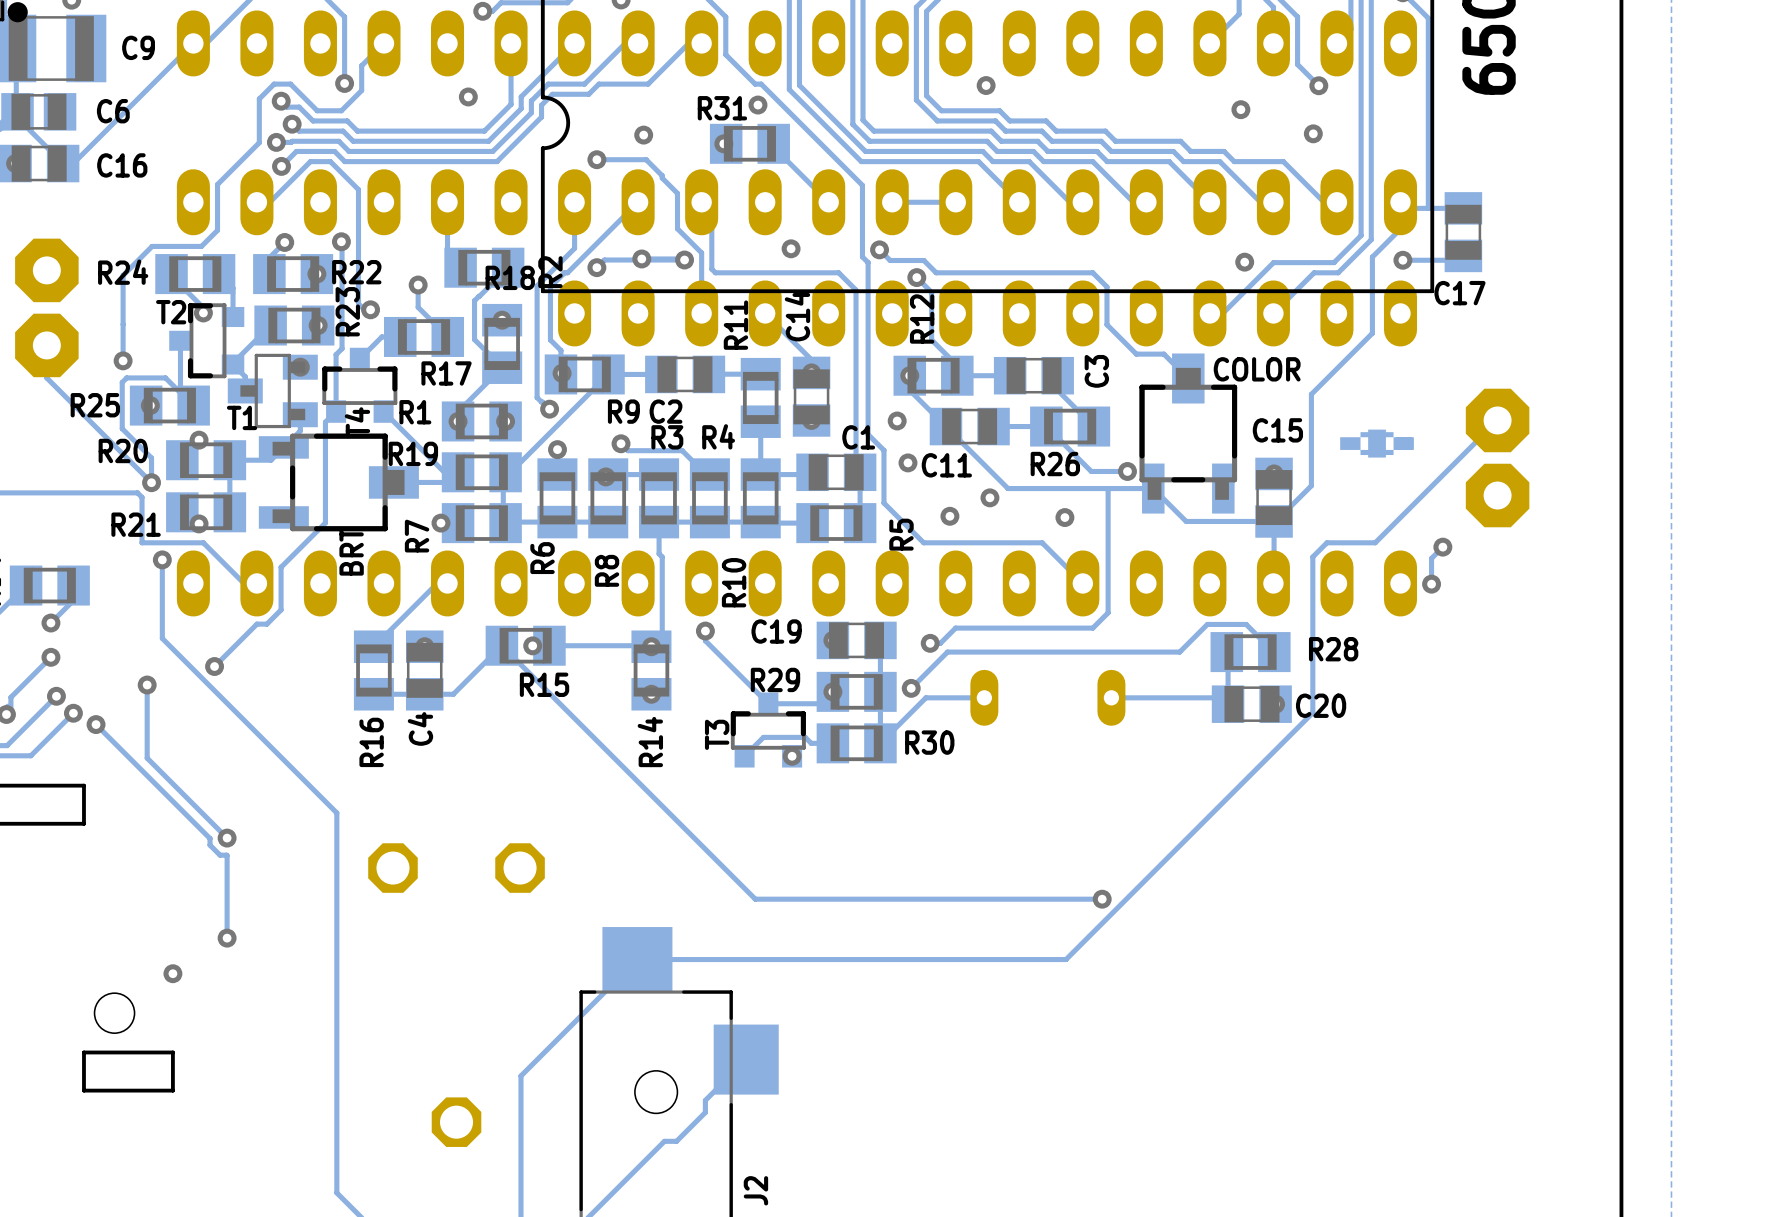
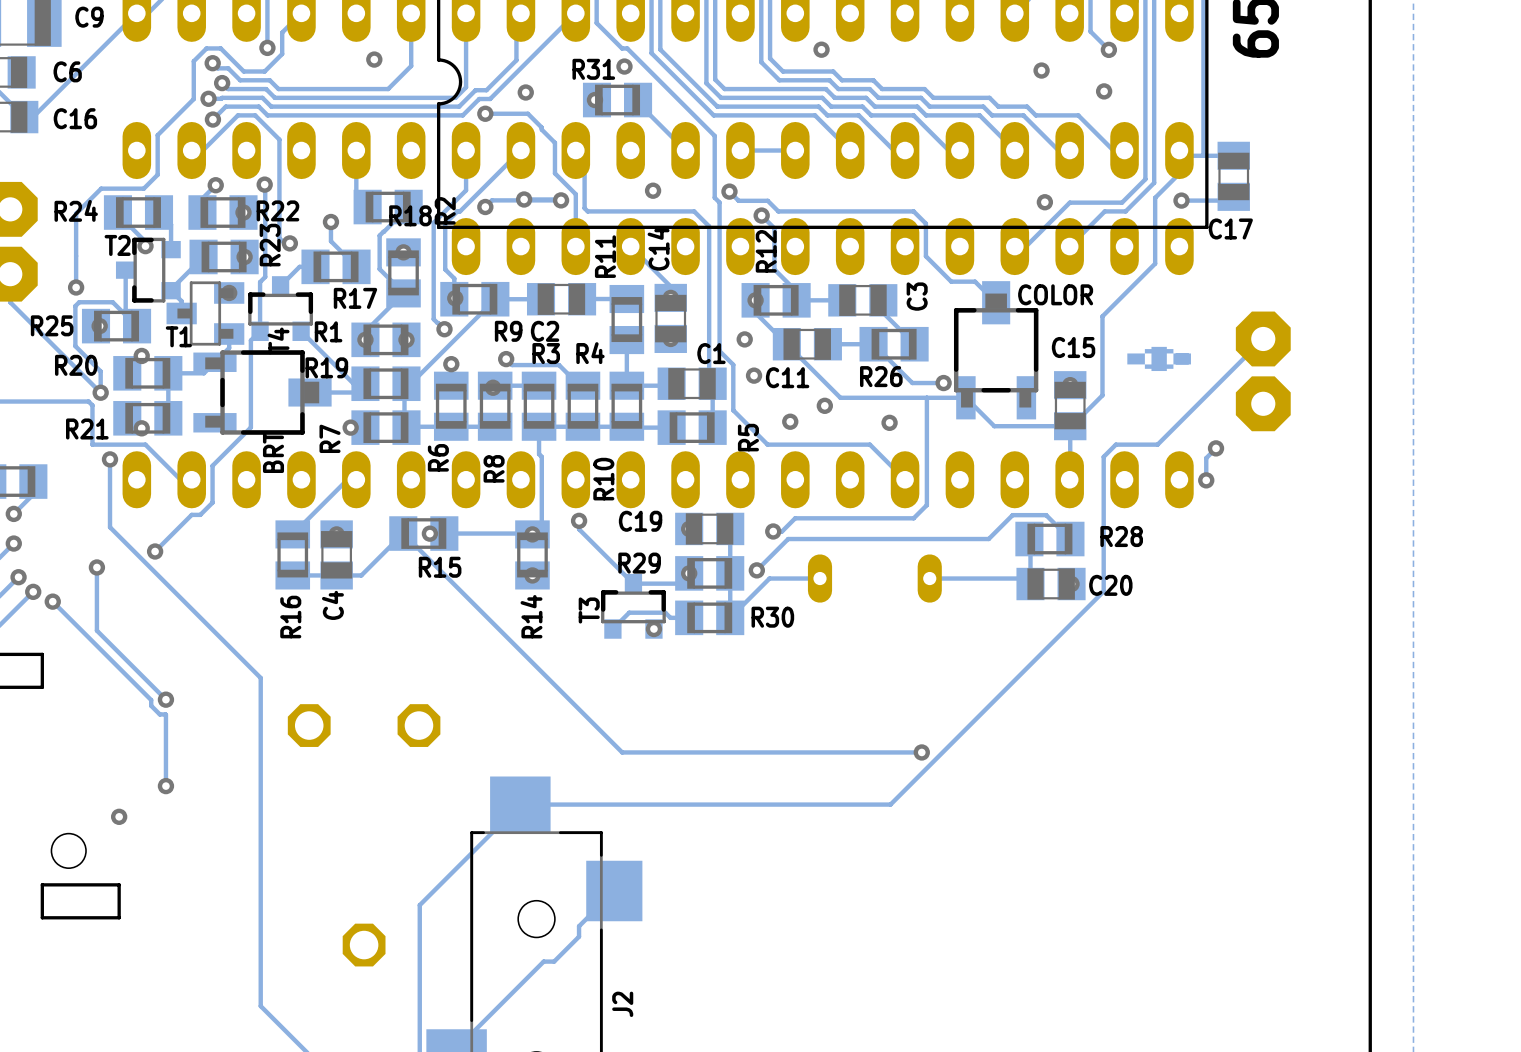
track: (574, 43) (521, 96) (521, 108) (488, 141) -> (466, 13) (466, 87) (455, 97) (391, 97)
track: (638, 43) (625, 43) (584, 84) (548, 84) (531, 101) (531, 112) (492, 151) -> (520, 13) (516, 17) (516, 60) (486, 90) (475, 90) (459, 106) (395, 106)
track: (701, 43) (688, 43) (648, 84) (598, 84) (588, 94) (552, 94) (541, 105) (541, 117) (497, 161) -> (575, 13) (490, 99) (479, 99) (462, 115) (399, 115)

